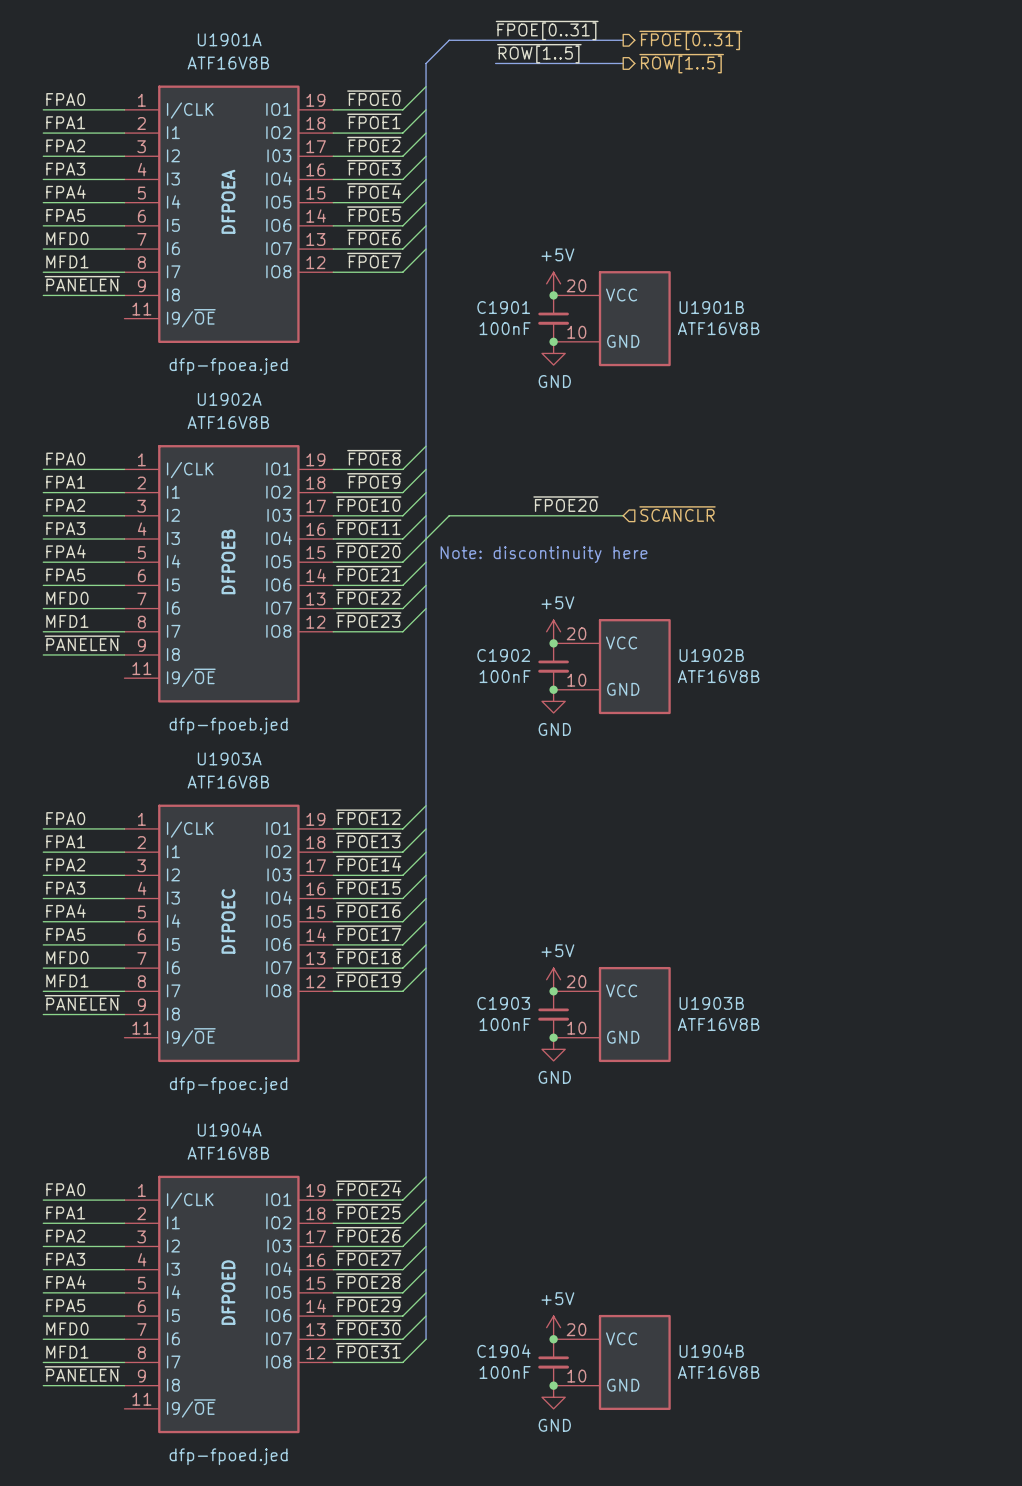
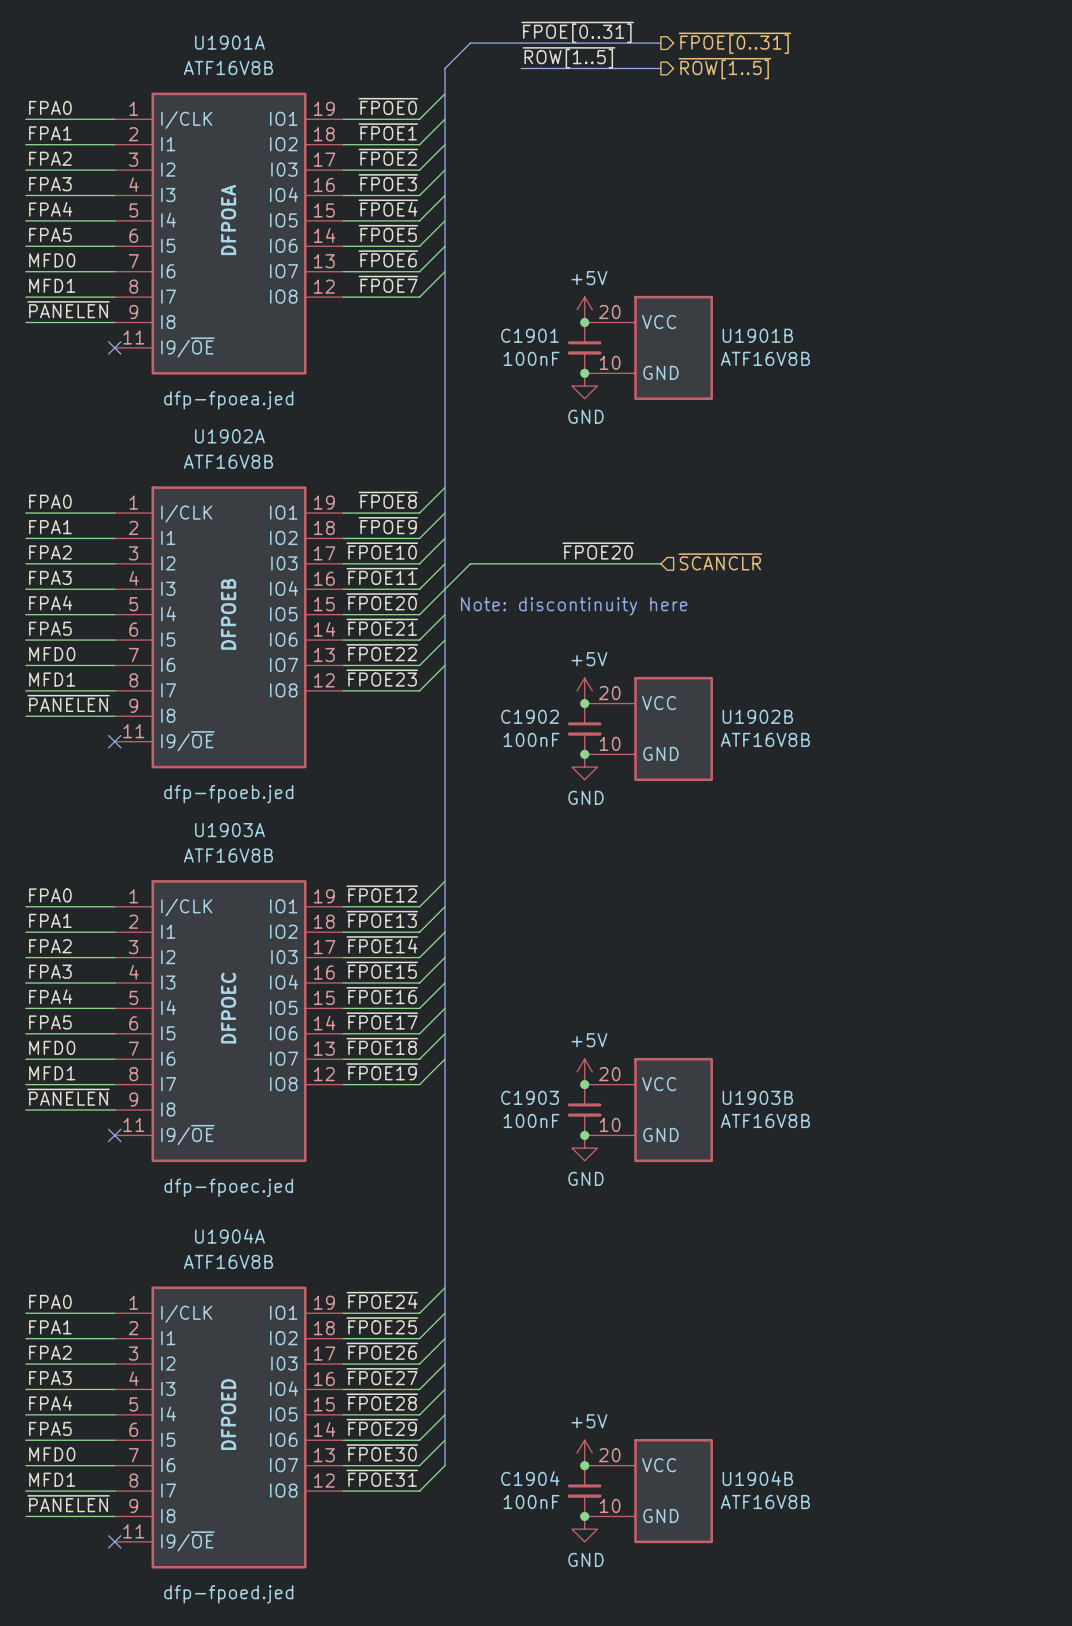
no-connect mark: none -> (114, 347)
no-connect mark: none -> (114, 741)
no-connect mark: none -> (114, 1135)
no-connect mark: none -> (114, 1541)

